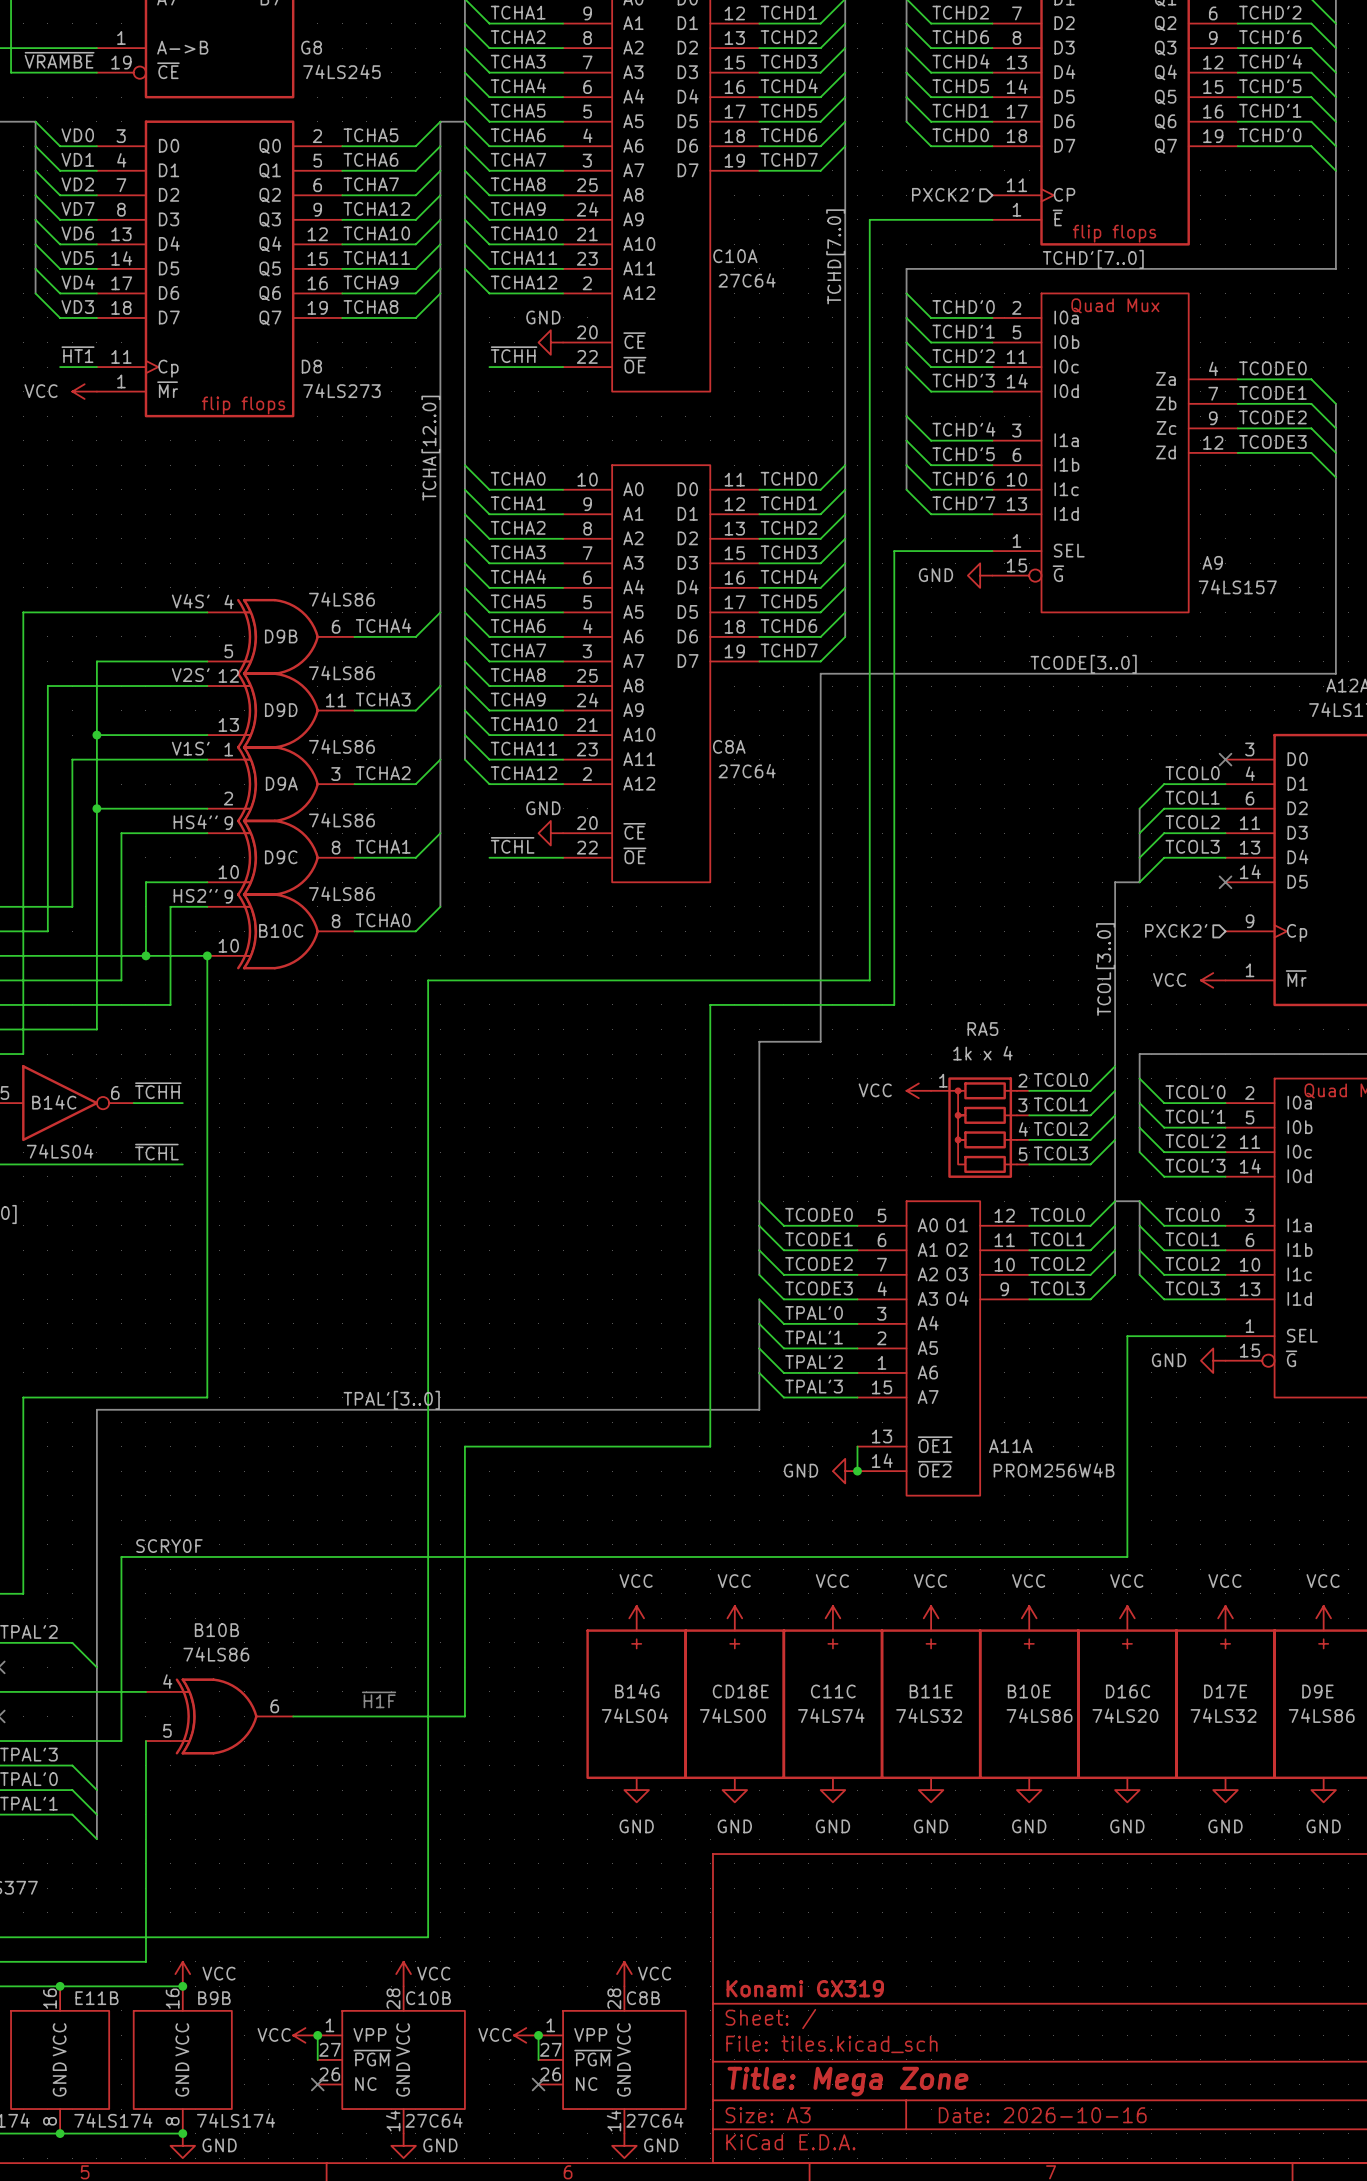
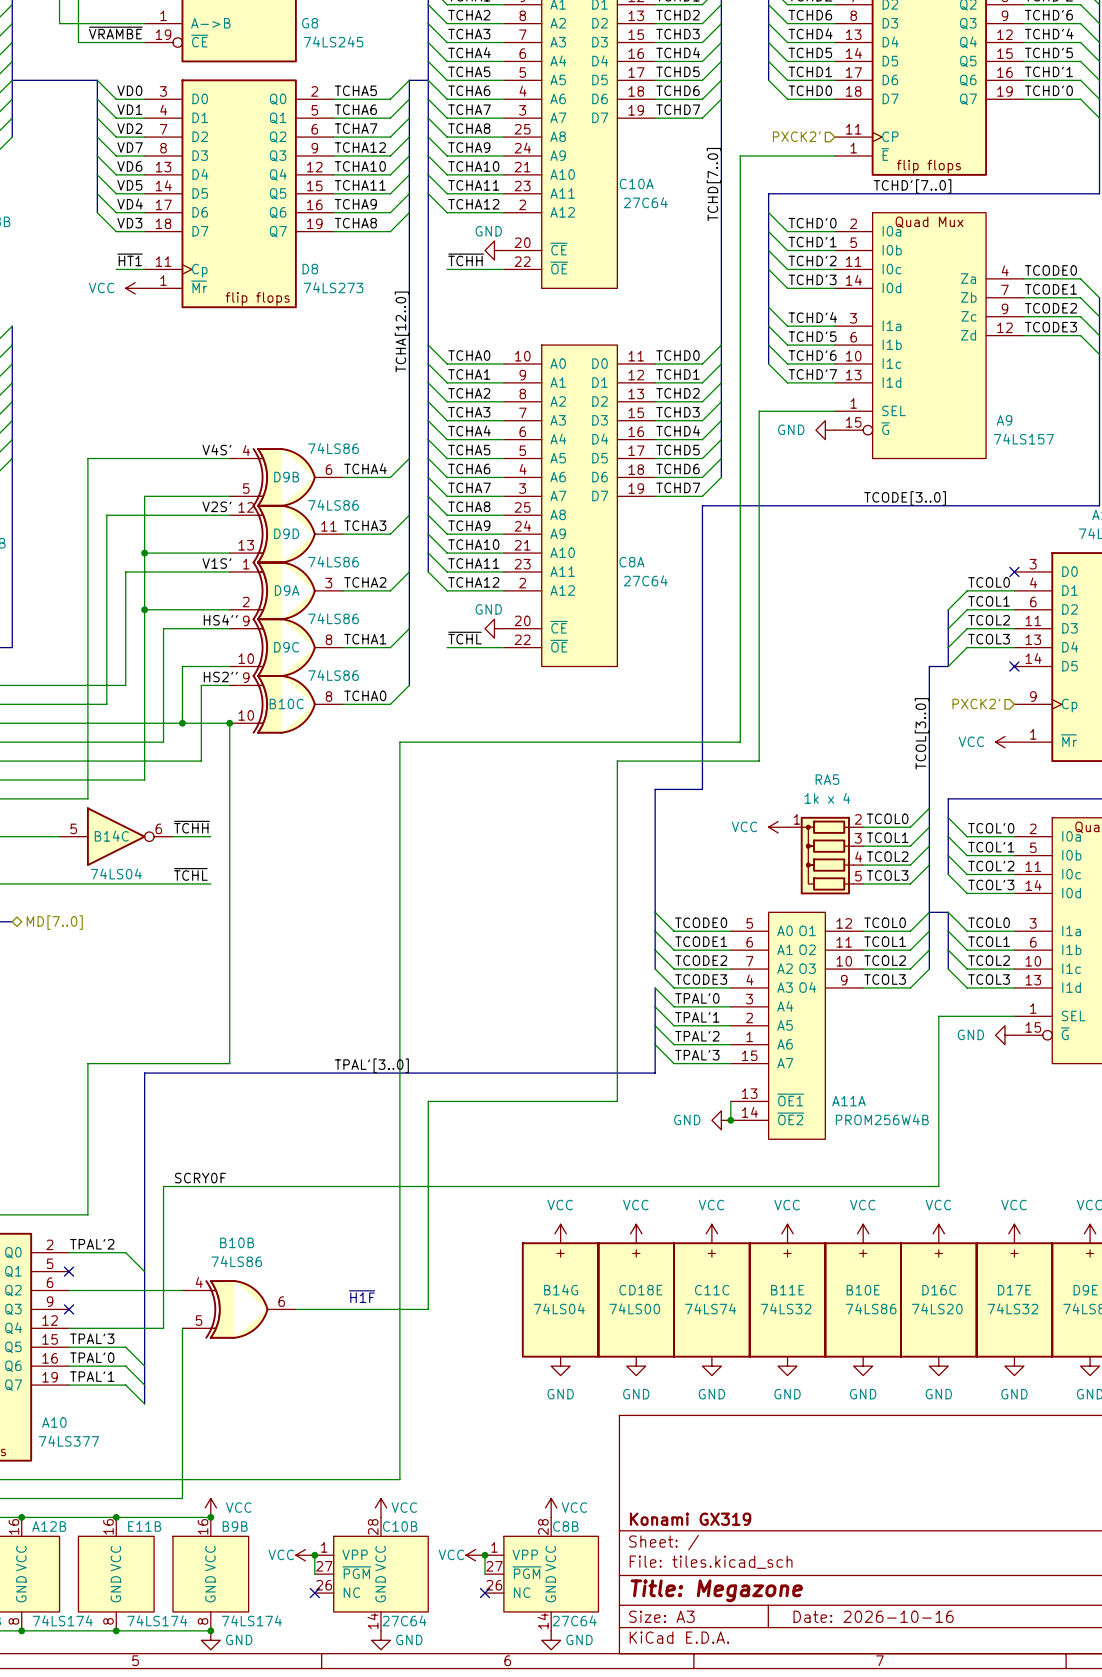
title block: Title: Mega Zone (848, 2081) -> Title: Megazone (716, 1590)

